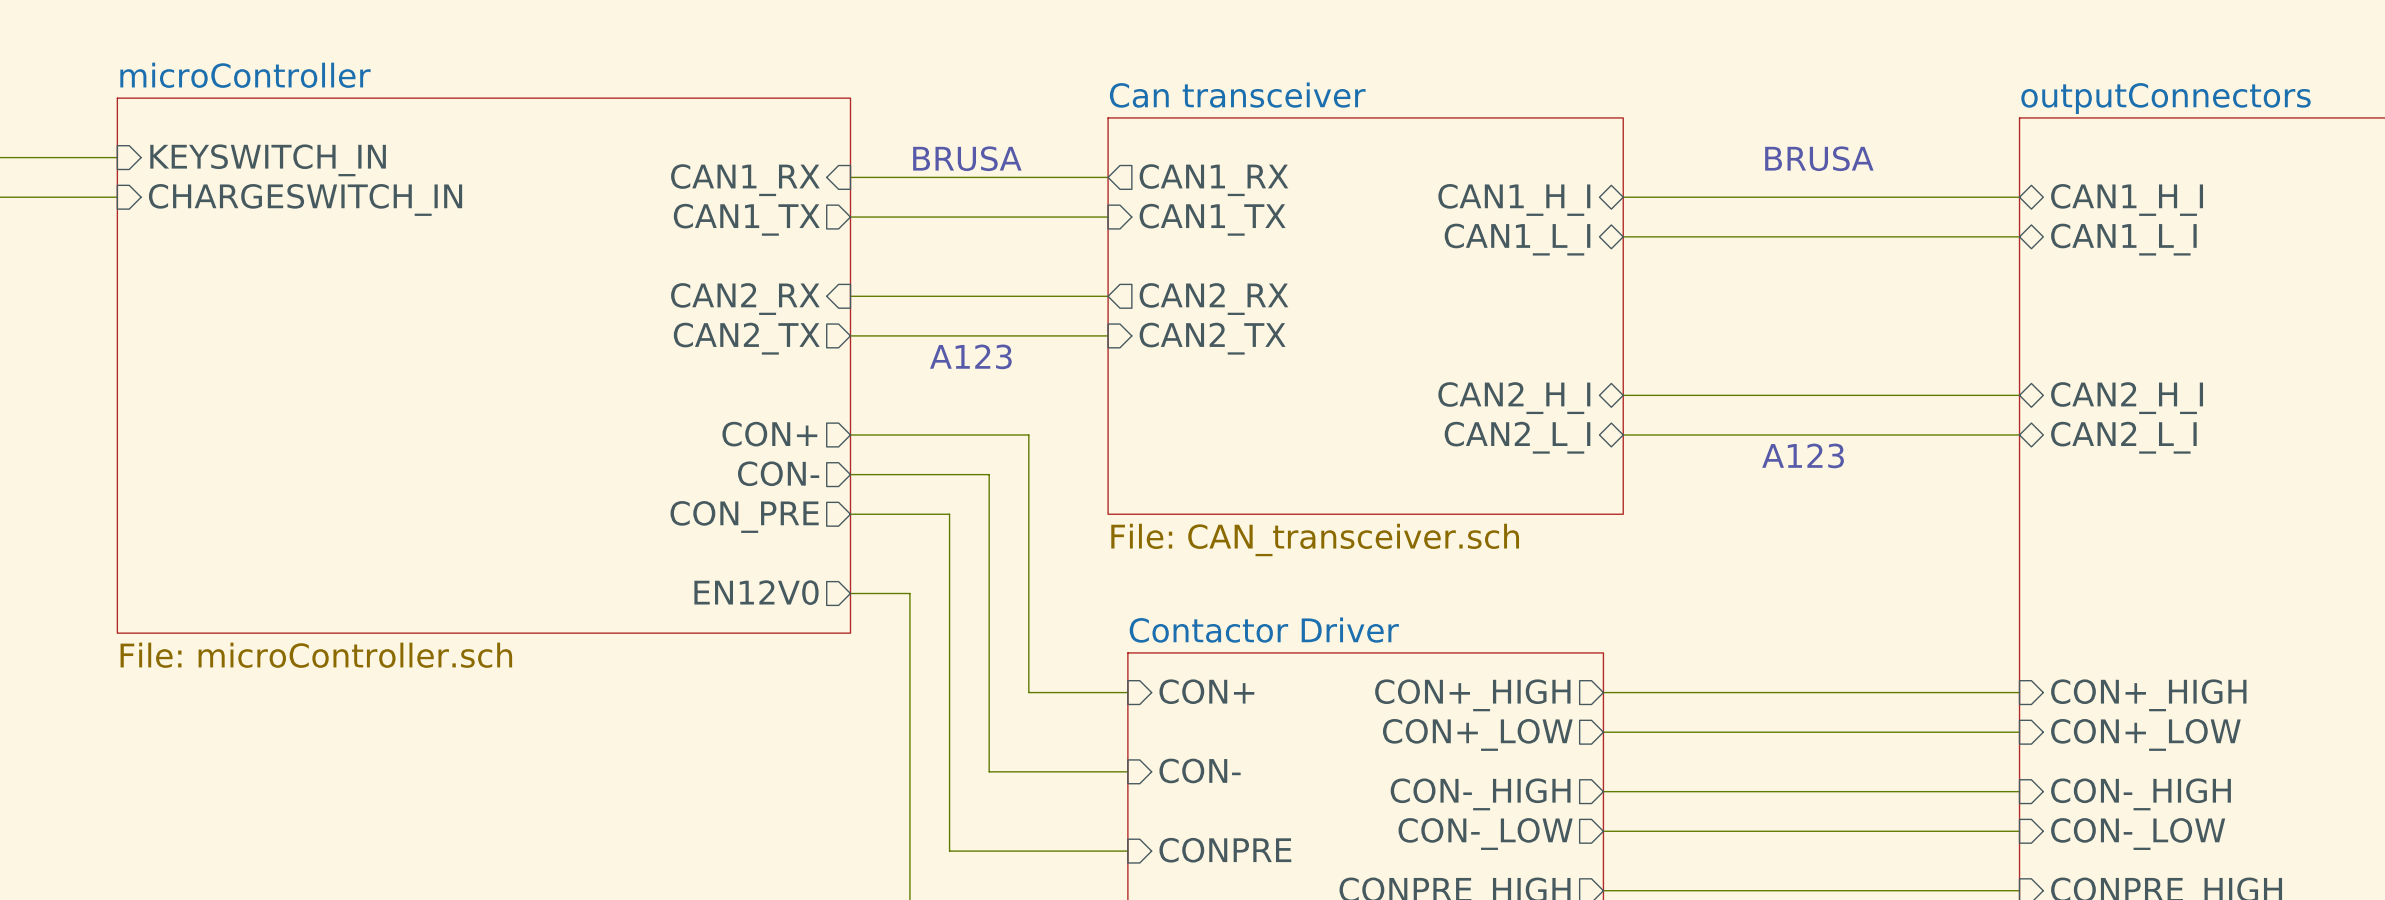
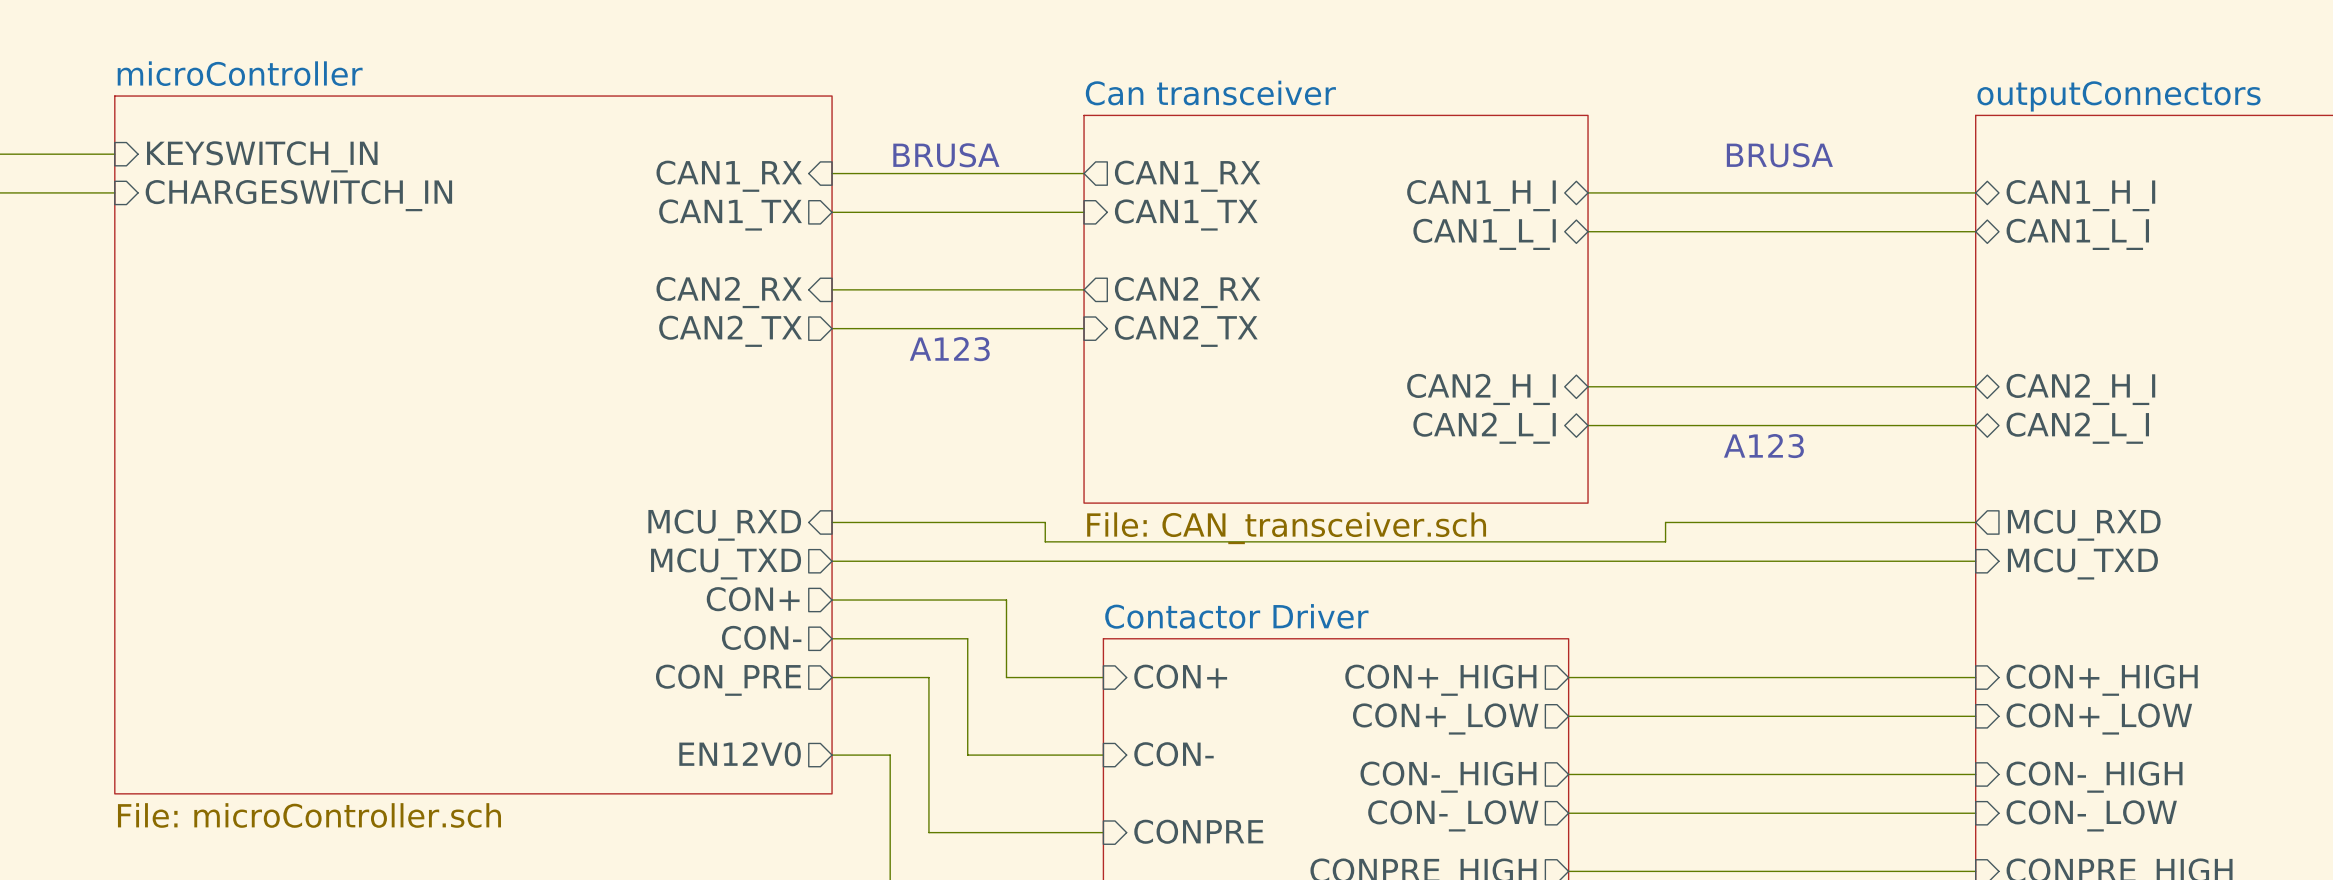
sheet microController: File: microController.sch (483, 365) -> none
sheet pin position: CON+ (769, 434) -> CON+ (753, 599)
wire: (850, 434) (1028, 434) (1028, 613) -> (832, 600) (1006, 600)
sheet microController: none -> File: microController.sch (473, 444)
sheet pin position: CON- (778, 473) -> CON- (761, 637)
wire: (850, 474) (989, 474) (989, 652) -> (832, 638) (967, 638)
wire: (850, 514) (949, 514) (949, 692) -> (832, 677) (928, 677)
sheet pin position: CON_PRE (744, 516) -> CON_PRE (728, 680)
wire: none -> (832, 522) (1045, 522) (1045, 541) (1665, 541) (1665, 522) (1975, 522)
sheet pin: none -> MCU_RXD (724, 525)
sheet pin: none -> MCU_RXD (2084, 525)
wire: none -> (832, 561) (1975, 561)
sheet pin: none -> MCU_TXD (726, 563)
sheet pin: none -> MCU_TXD (2082, 563)
sheet pin position: EN12V0 (756, 592) -> EN12V0 (740, 754)
wire: (850, 593) (909, 593) (909, 771) -> (832, 755) (890, 755)

